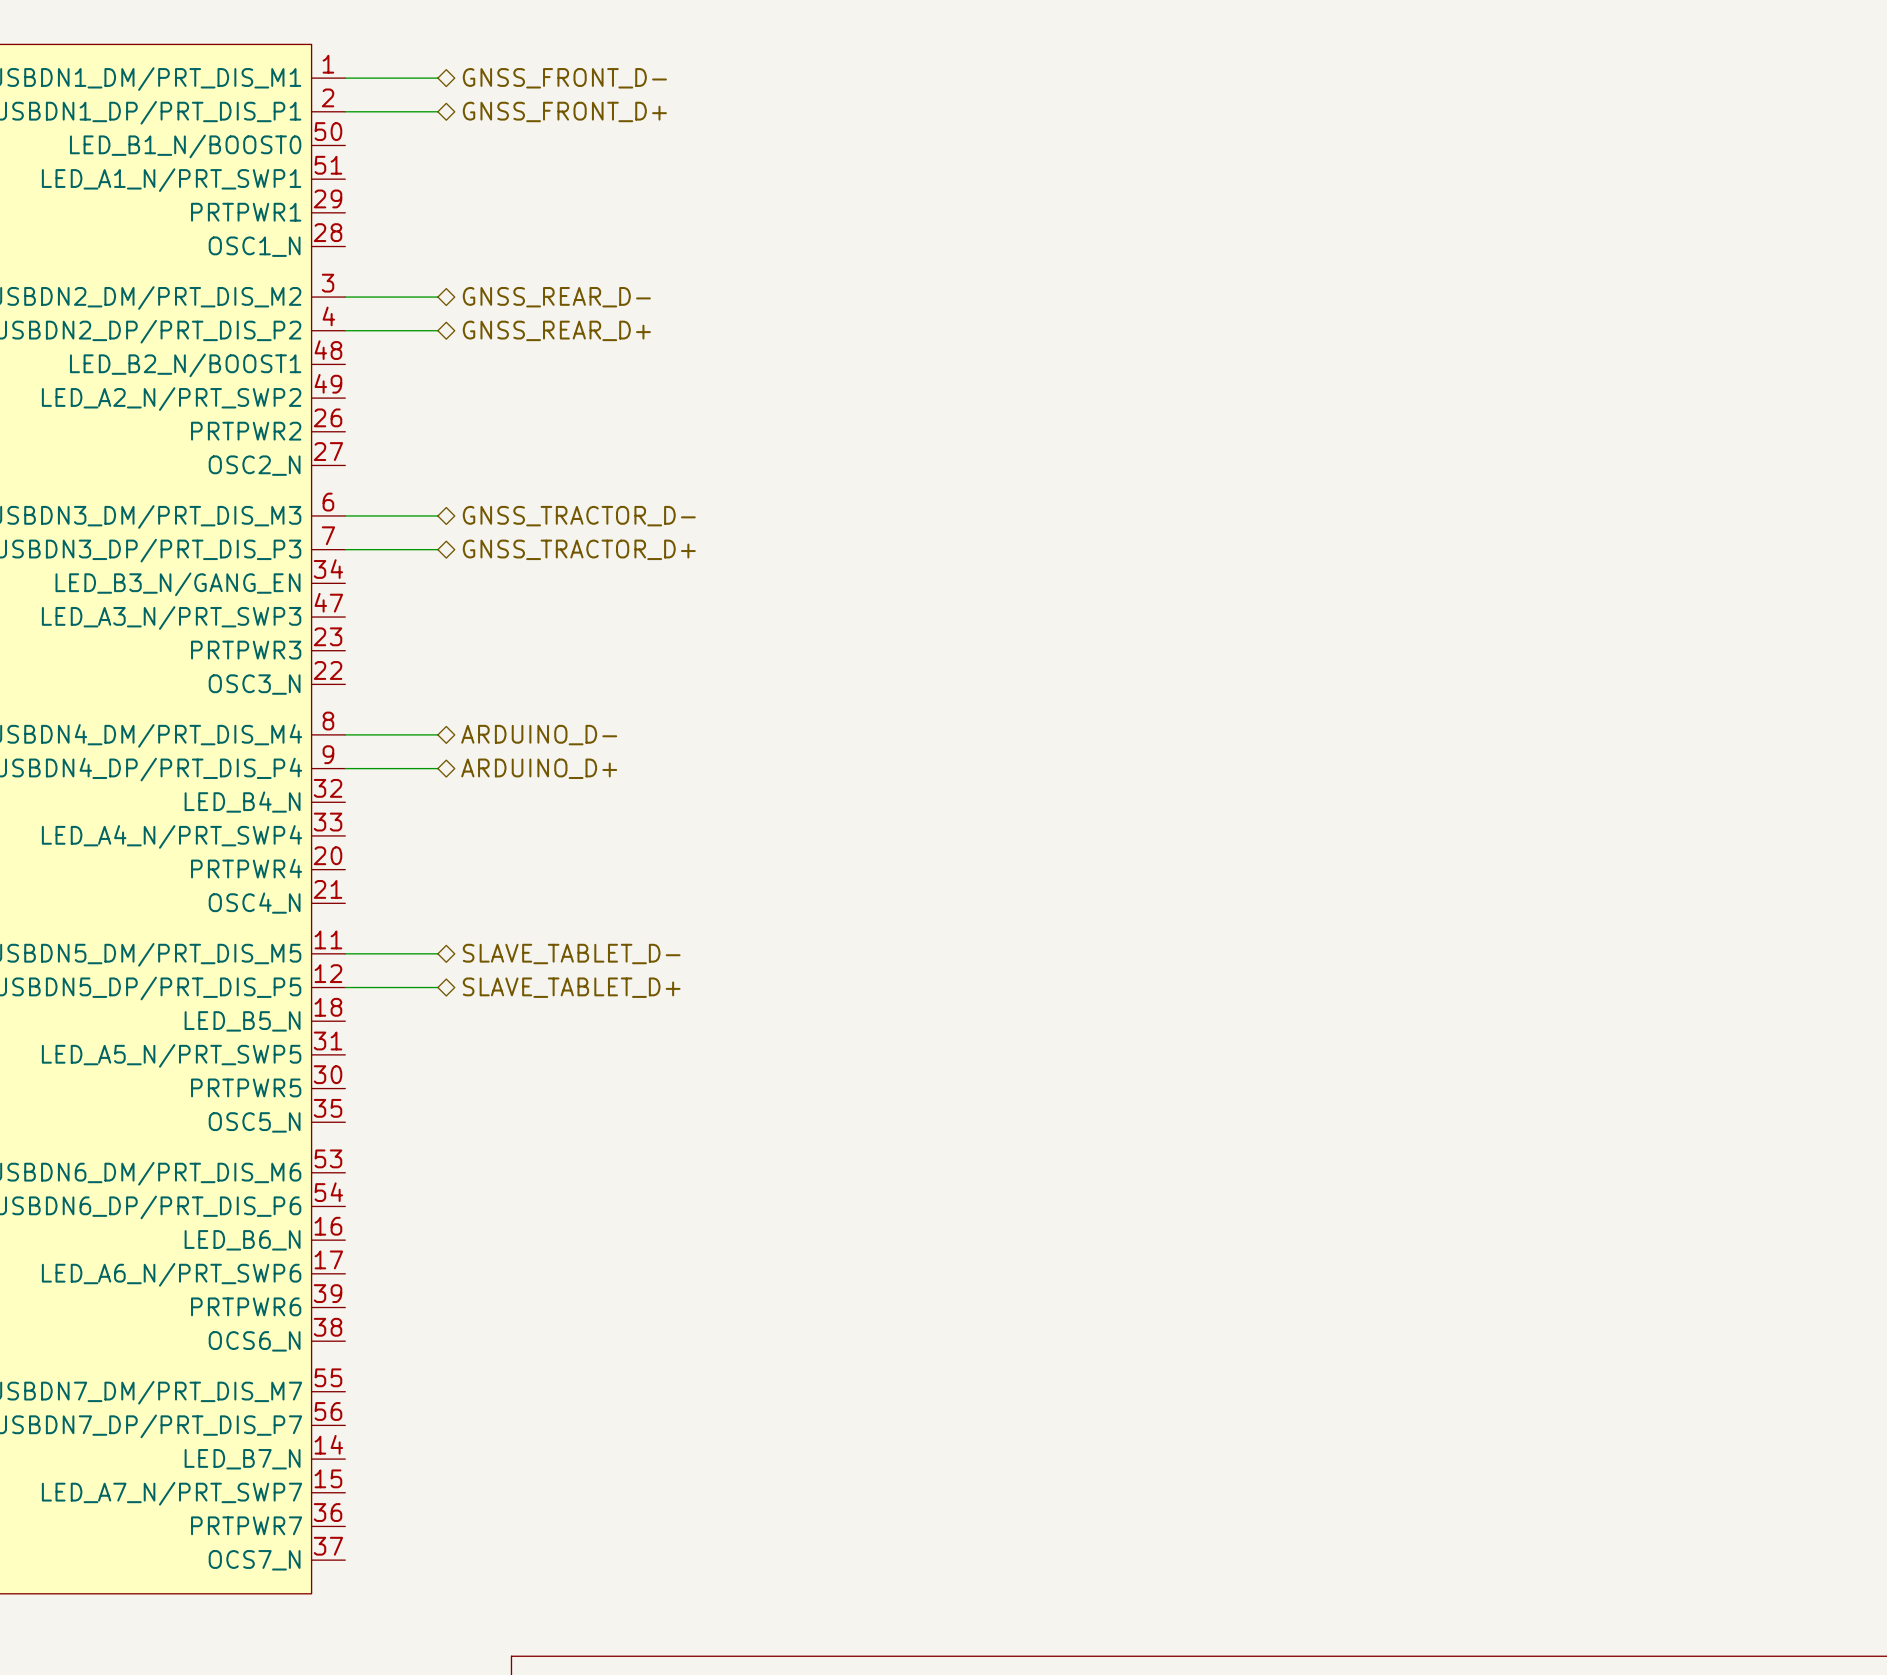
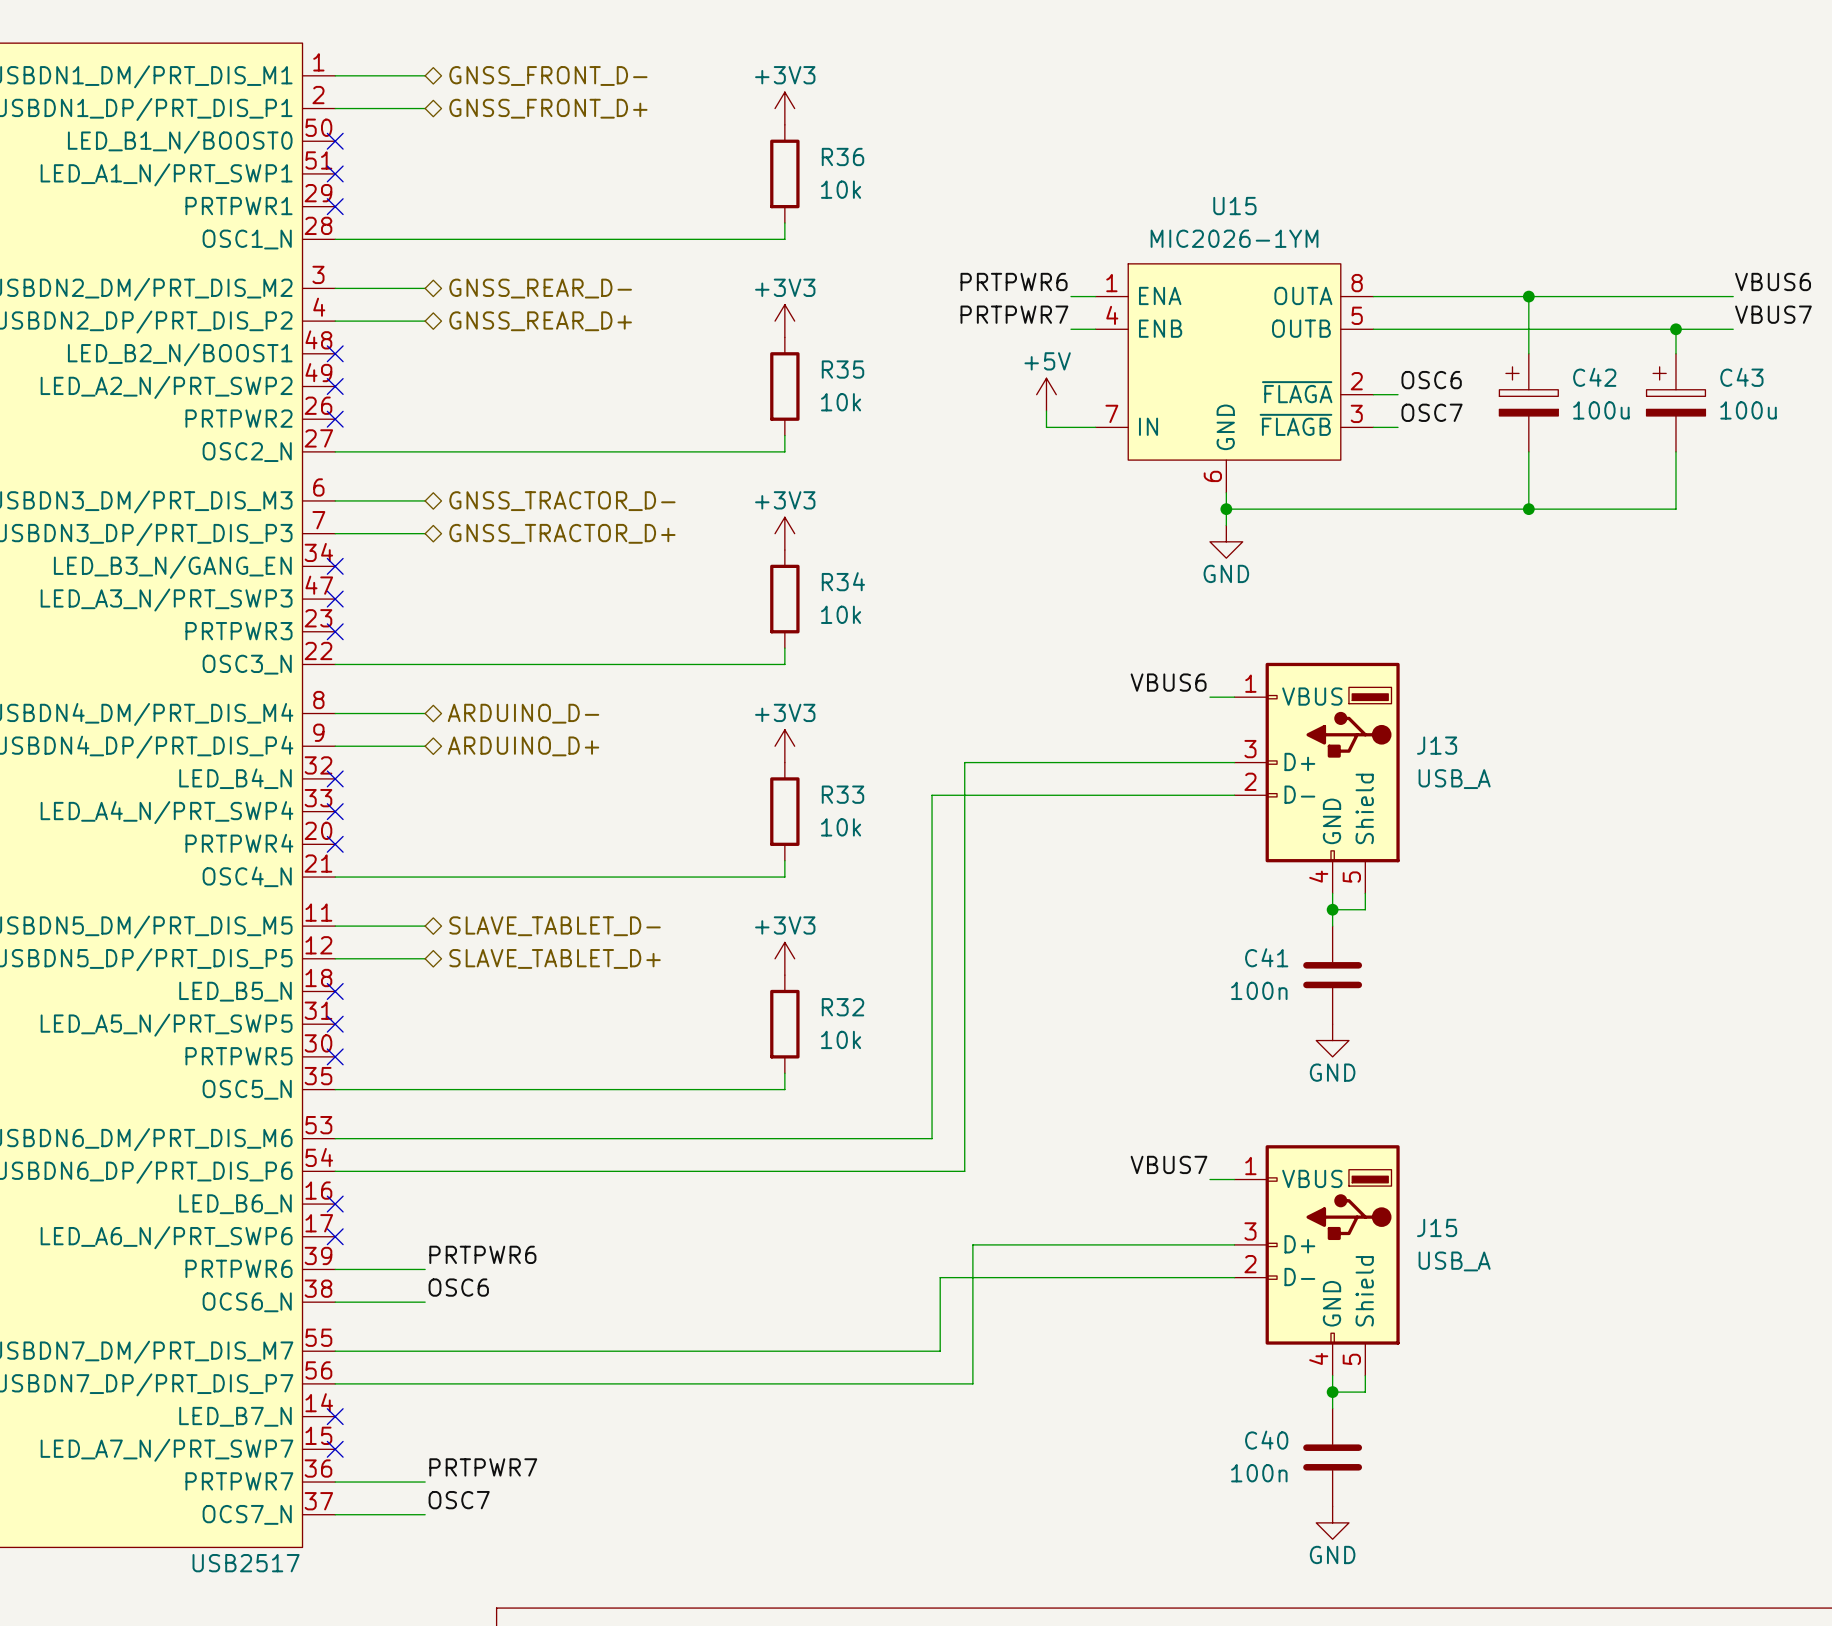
power symbol: none -> +3V3 (784, 108)
no-connect mark: none -> (335, 141)
no-connect mark: none -> (335, 173)
R36: none -> 10k (784, 173)
no-connect mark: none -> (335, 206)
wire: none -> (784, 222) (784, 239) (335, 239)
label: none -> PRTPWR6 (1014, 281)
label: none -> VBUS6 (1773, 281)
wire: none -> (1071, 296) (1095, 296)
wire: none -> (1373, 296) (1733, 296)
wire: none -> (1528, 296) (1528, 353)
junction: none -> (1528, 296)
label: none -> PRTPWR7 (1014, 314)
label: none -> VBUS7 (1773, 314)
power symbol: none -> +3V3 (784, 321)
wire: none -> (1071, 329) (1095, 329)
wire: none -> (1373, 329) (1733, 329)
wire: none -> (1675, 329) (1675, 353)
junction: none -> (1675, 329)
no-connect mark: none -> (335, 353)
U15: none -> MIC2026-1YM (1234, 378)
label: none -> OSC6 (1431, 380)
no-connect mark: none -> (335, 386)
R35: none -> 10k (784, 386)
power symbol: none -> +5V (1046, 394)
wire: none -> (1373, 394) (1398, 394)
C42: none -> 100u (1528, 402)
C43: none -> 100u (1675, 402)
wire: none -> (1046, 411) (1046, 427) (1095, 427)
label: none -> OSC7 (1432, 412)
no-connect mark: none -> (335, 419)
wire: none -> (1373, 427) (1398, 427)
wire: none -> (784, 435) (784, 451) (335, 451)
wire: none -> (1528, 451) (1528, 509)
wire: none -> (1675, 451) (1675, 509) (1226, 509)
wire: none -> (1226, 492) (1226, 525)
junction: none -> (1226, 509)
junction: none -> (1528, 509)
power symbol: none -> +3V3 (784, 533)
power symbol: none -> GND (1226, 541)
no-connect mark: none -> (335, 566)
no-connect mark: none -> (335, 599)
R34: none -> 10k (784, 599)
no-connect mark: none -> (335, 631)
wire: none -> (784, 648) (784, 664) (335, 664)
label: none -> VBUS6 (1168, 682)
wire: none -> (1209, 697) (1234, 697)
power symbol: none -> +3V3 (784, 746)
wire: none -> (1234, 762) (964, 762) (964, 1171) (335, 1171)
J13: none -> USB_A (1317, 778)
no-connect mark: none -> (335, 778)
wire: none -> (1234, 795) (932, 795) (932, 1138) (335, 1138)
no-connect mark: none -> (335, 811)
R33: none -> 10k (784, 811)
no-connect mark: none -> (335, 844)
wire: none -> (784, 860) (784, 877) (335, 877)
wire: none -> (1332, 893) (1332, 926)
wire: none -> (1365, 893) (1365, 909) (1332, 909)
junction: none -> (1332, 909)
power symbol: none -> +3V3 (784, 958)
C41: none -> 100n (1332, 975)
no-connect mark: none -> (335, 991)
no-connect mark: none -> (335, 1024)
R32: none -> 10k (784, 1024)
power symbol: none -> GND (1332, 1040)
no-connect mark: none -> (335, 1056)
wire: none -> (784, 1073) (784, 1089) (335, 1089)
label: none -> VBUS7 (1168, 1164)
wire: none -> (1209, 1179) (1234, 1179)
no-connect mark: none -> (335, 1204)
no-connect mark: none -> (335, 1236)
wire: none -> (1234, 1244) (972, 1244) (972, 1383) (335, 1383)
label: none -> PRTPWR6 (482, 1254)
J15: none -> USB_A (1317, 1260)
wire: none -> (335, 1269) (425, 1269)
wire: none -> (1234, 1277) (940, 1277) (940, 1351) (335, 1351)
label: none -> OSC6 (458, 1287)
wire: none -> (335, 1302) (425, 1302)
wire: none -> (1332, 1375) (1332, 1408)
wire: none -> (1365, 1375) (1365, 1392) (1332, 1392)
junction: none -> (1332, 1392)
no-connect mark: none -> (335, 1416)
no-connect mark: none -> (335, 1449)
C40: none -> 100n (1332, 1457)
label: none -> PRTPWR7 (483, 1467)
wire: none -> (335, 1482) (425, 1482)
label: none -> OSC7 (459, 1500)
wire: none -> (335, 1514) (425, 1514)
power symbol: none -> GND (1332, 1522)
part value: none -> USB2517 (246, 1563)

